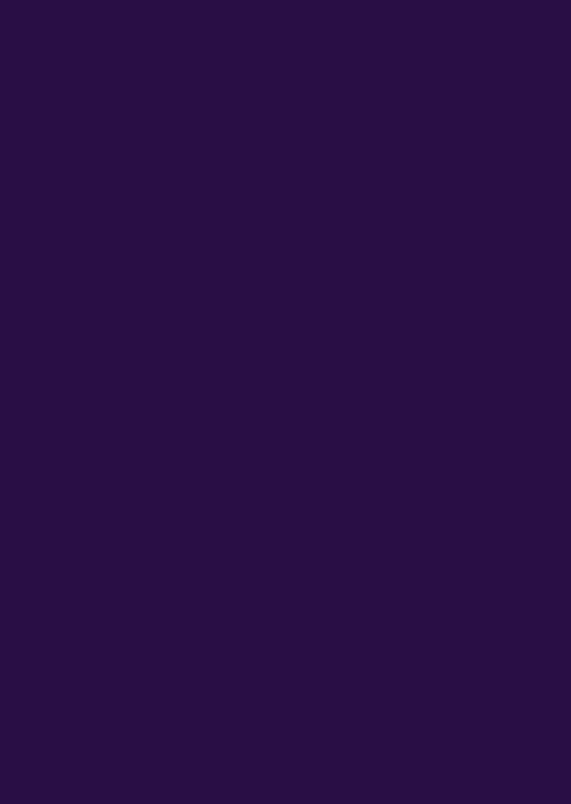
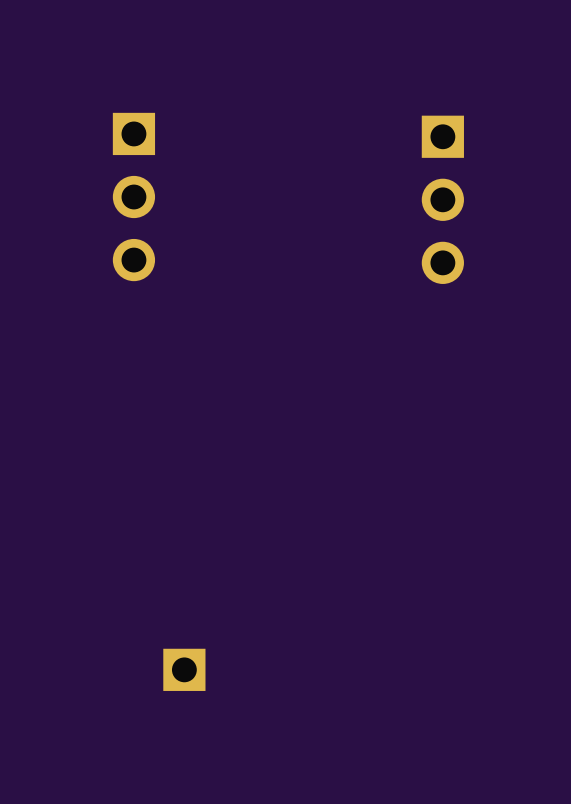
part: none -> (133, 197)
part: none -> (442, 199)
part: none -> (184, 669)

